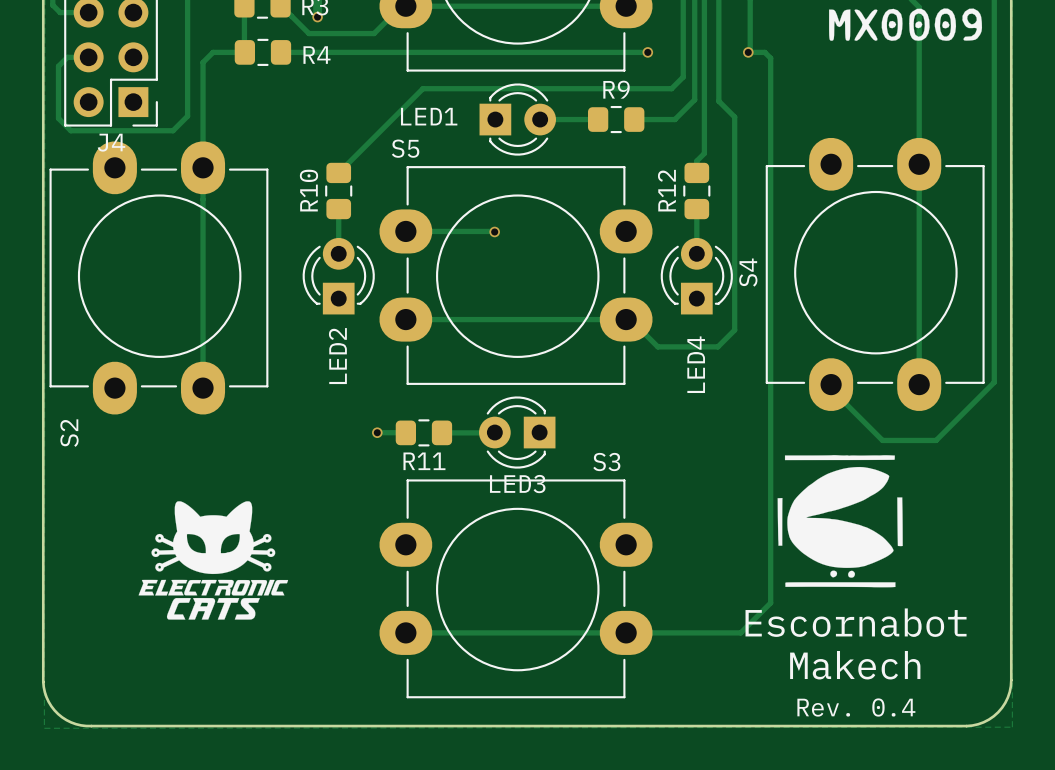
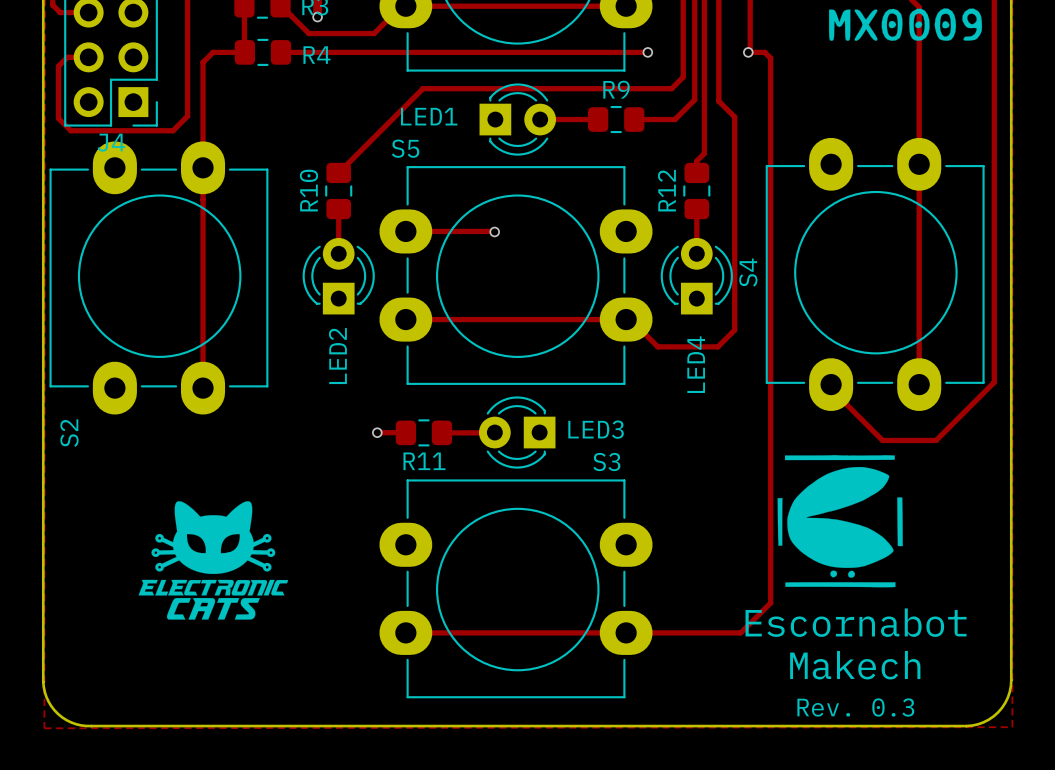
LED3 name position: LED3 (517, 484) -> LED3 (596, 429)
text: Rev. 0.4 (856, 707) -> Rev. 0.3 (855, 707)

